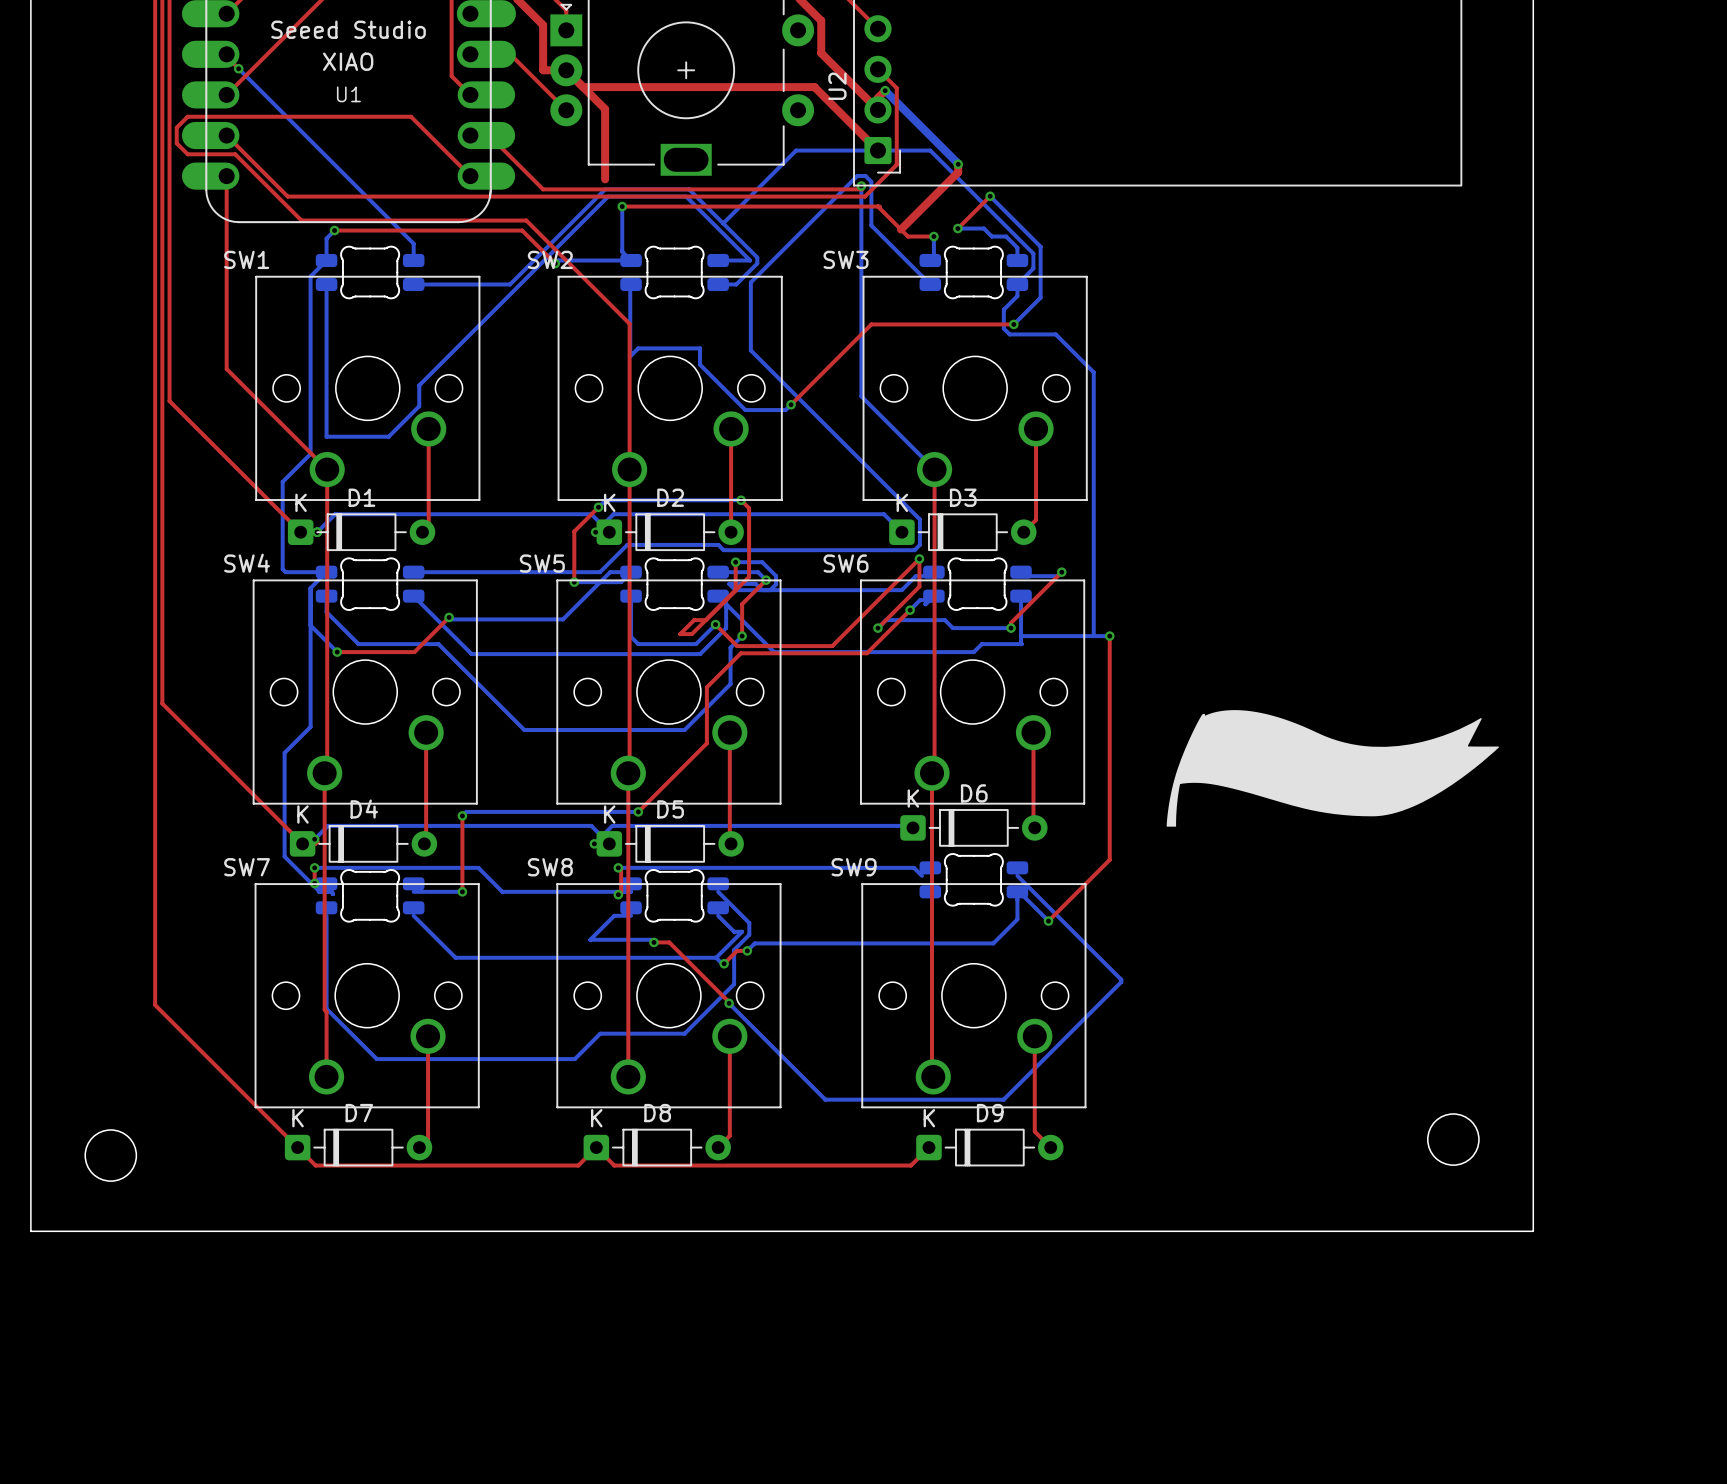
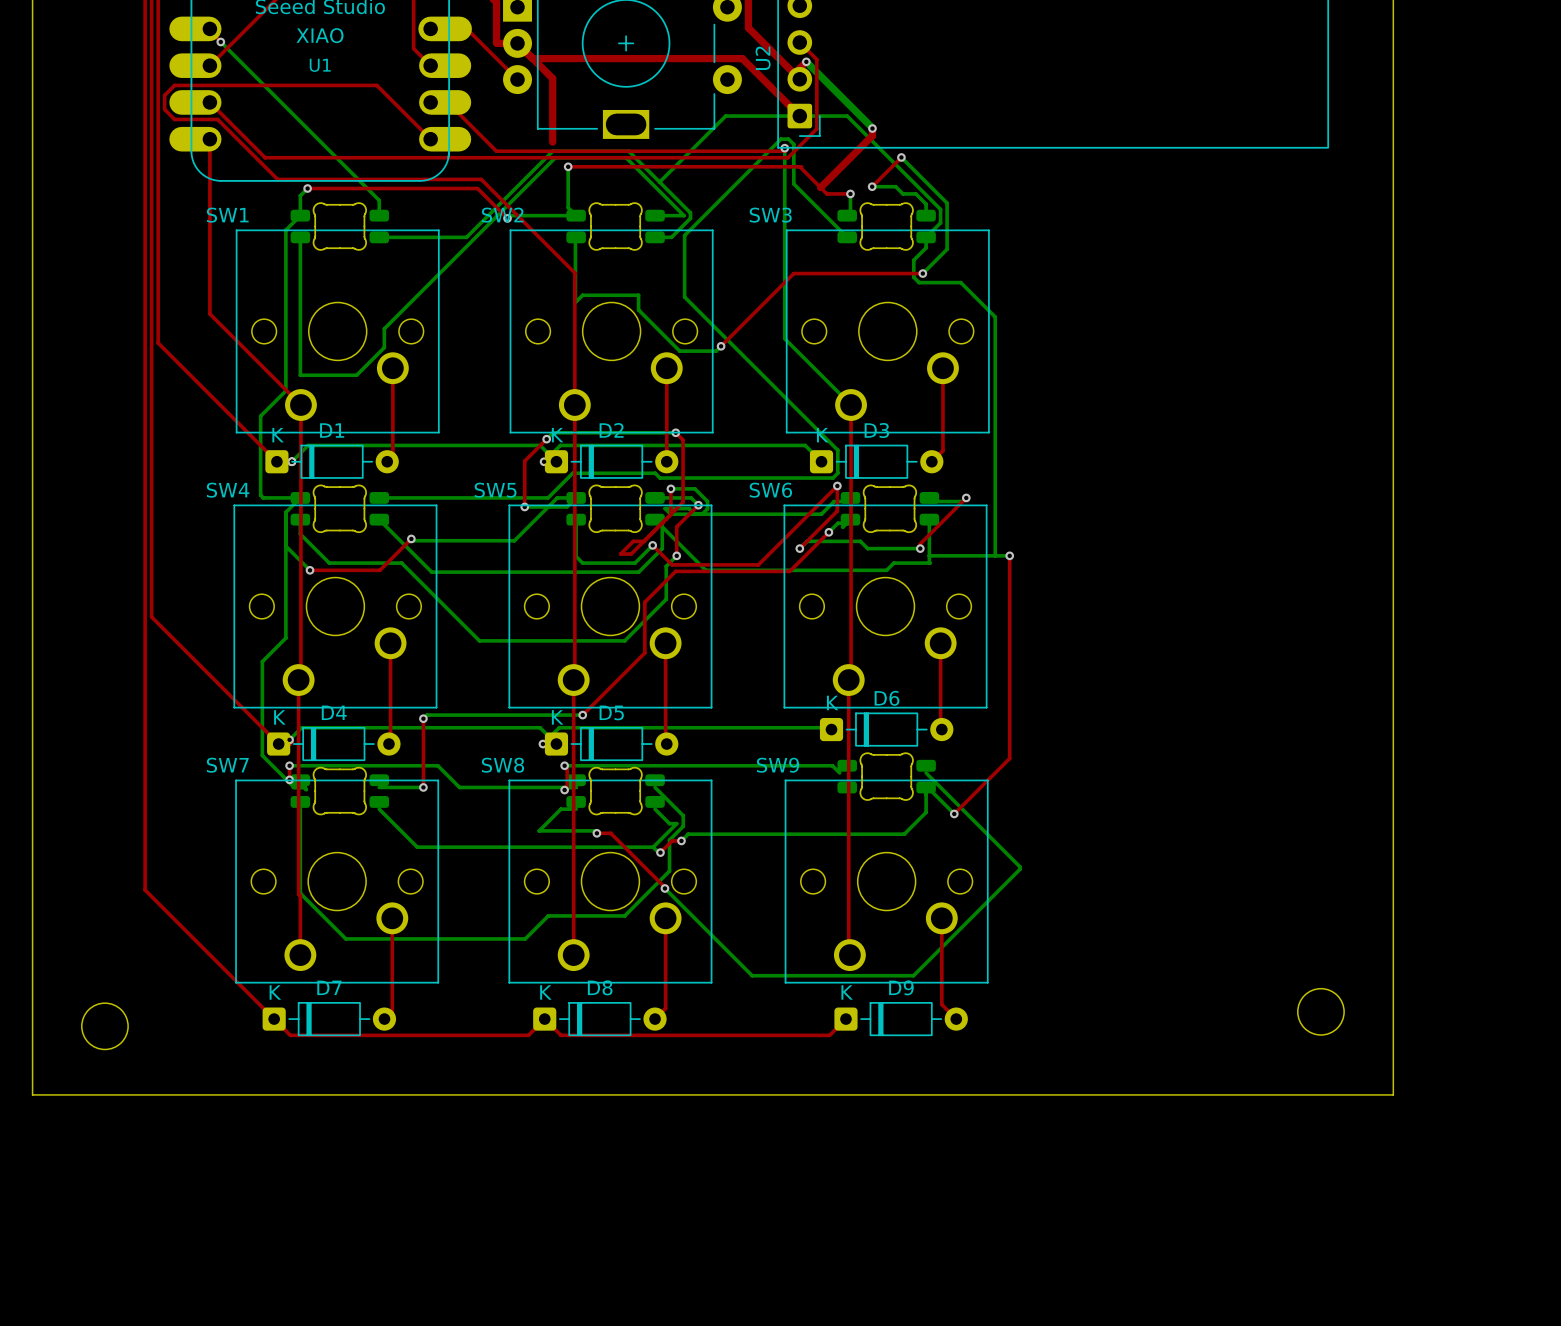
drawing: [1166, 710, 1499, 827] -> none

